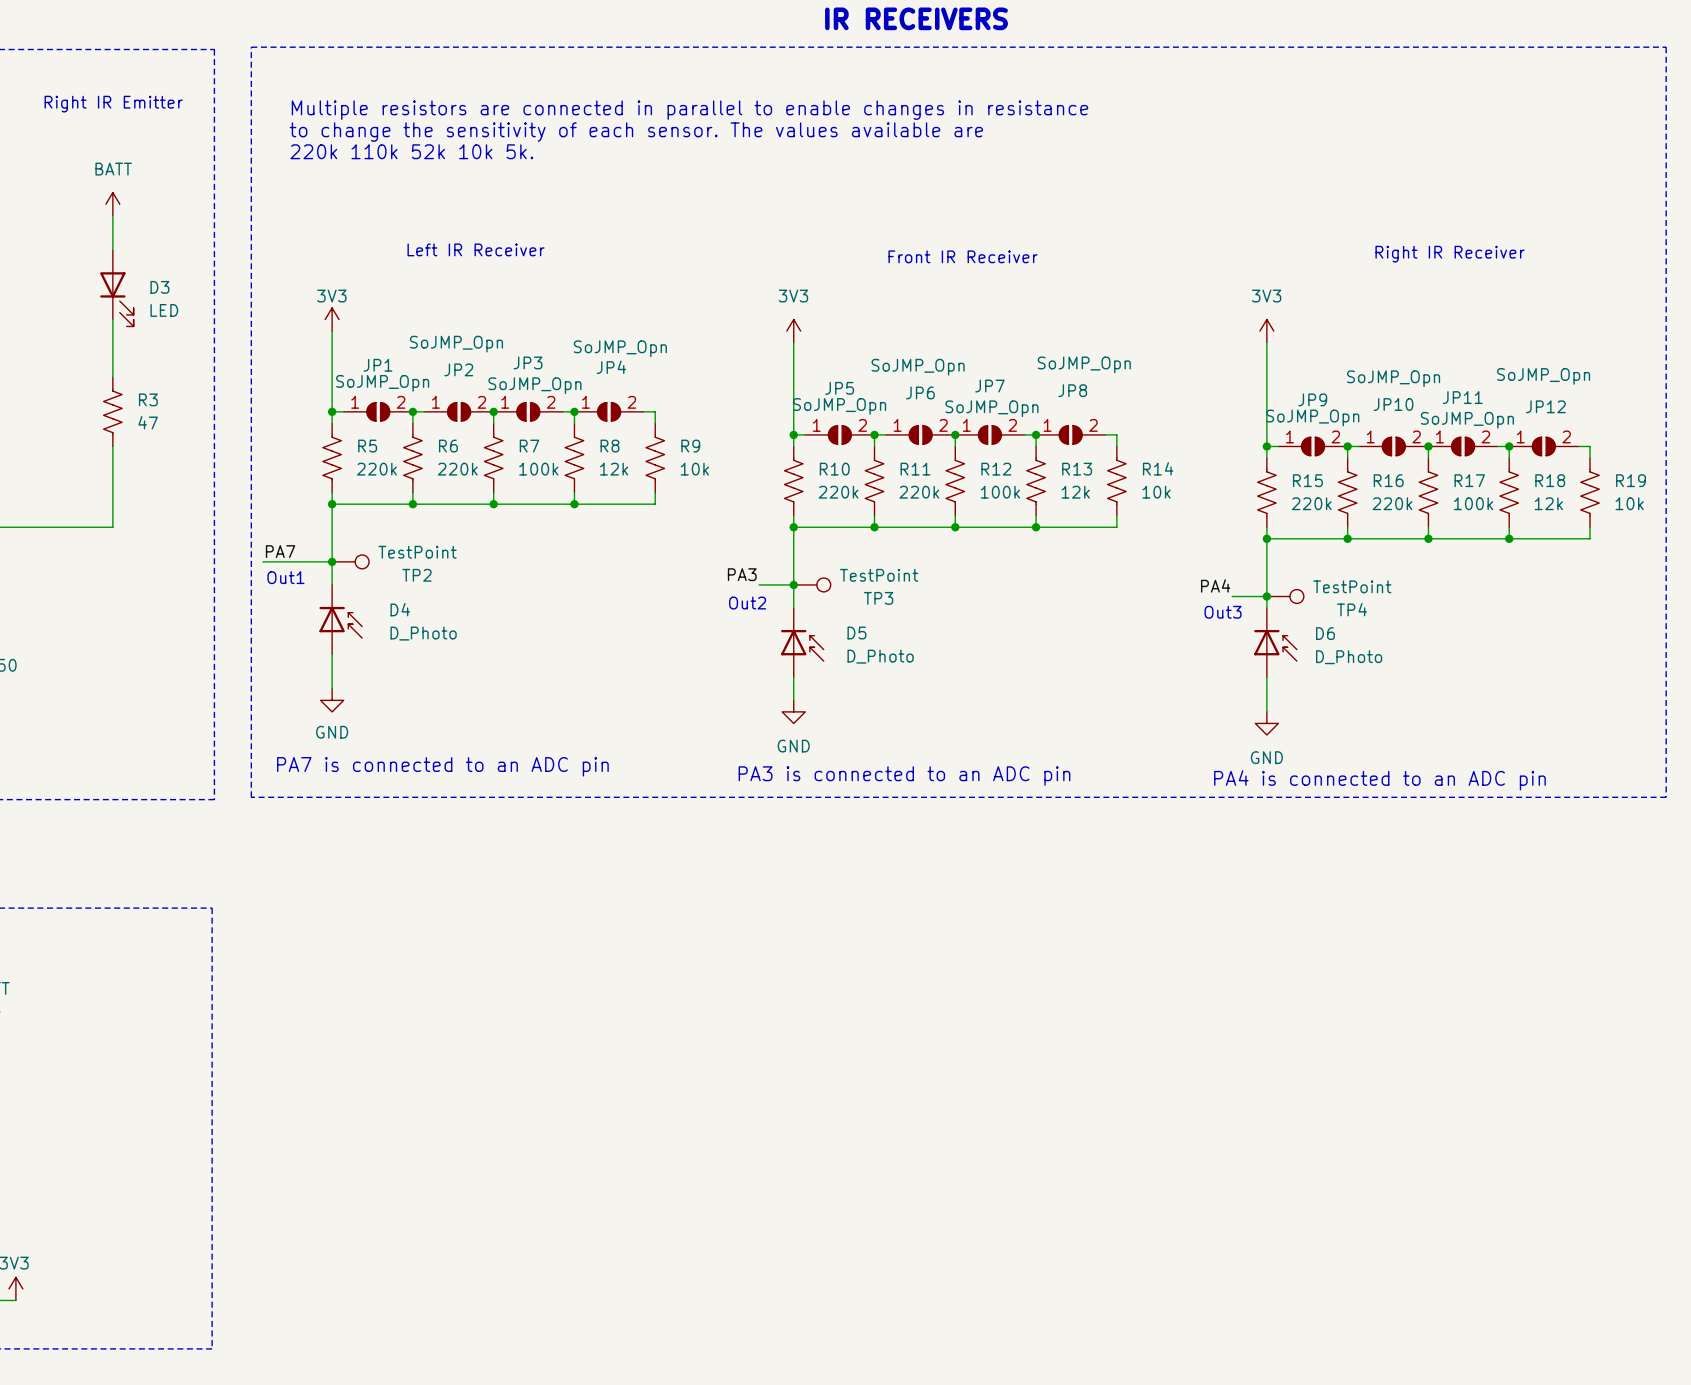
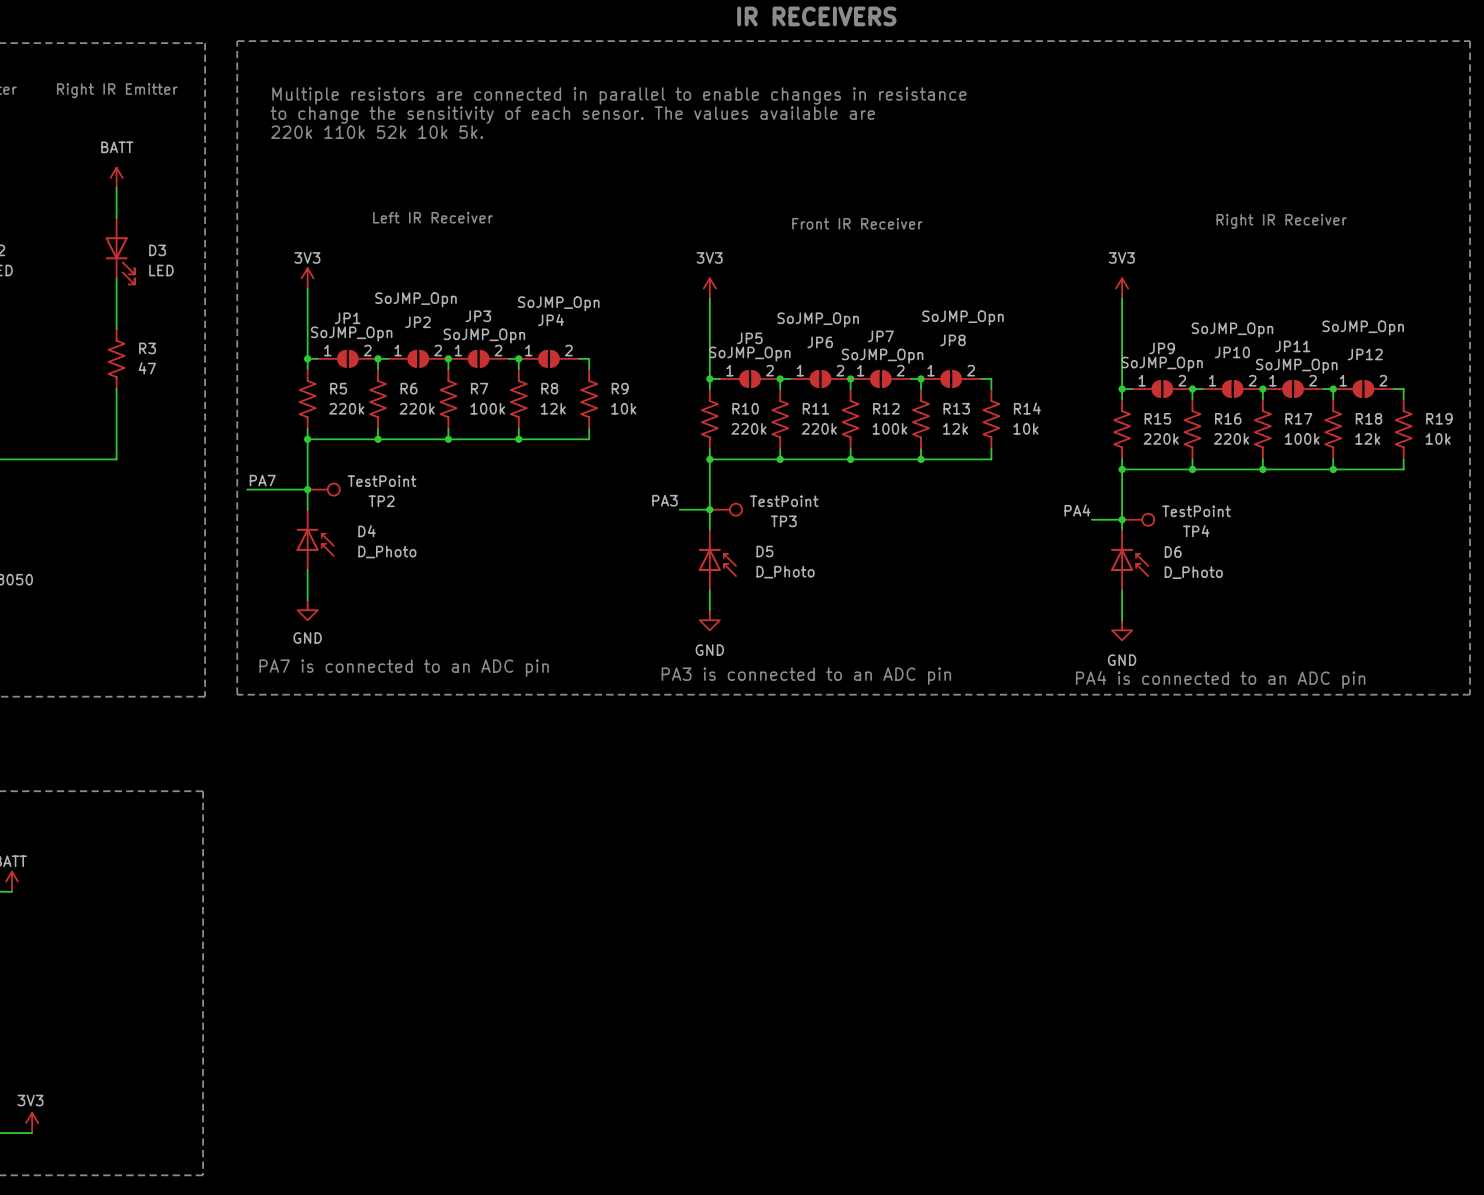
text: Out1 (285, 577) -> none
text: Out2 (747, 603) -> none
text: Out3 (1223, 612) -> none

